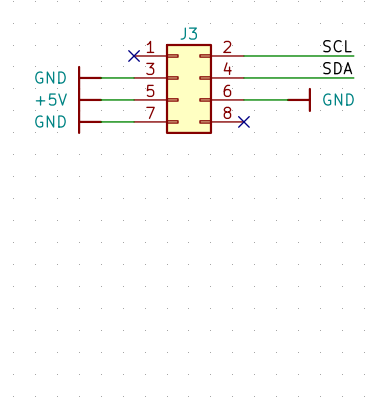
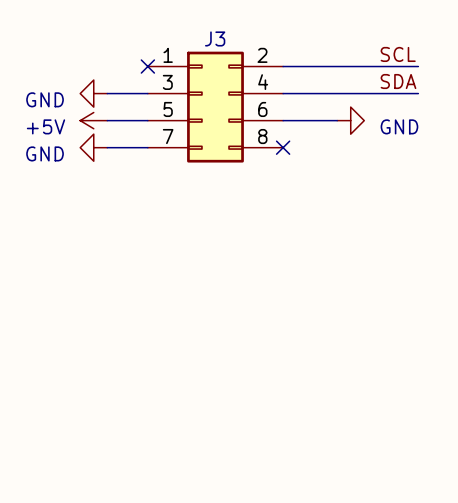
power symbol shape: [77, 65, 103, 91] -> [80, 80, 108, 108]
power symbol shape: [77, 87, 103, 113] -> [80, 112, 108, 129]
power symbol shape: [286, 87, 311, 113] -> [337, 107, 365, 135]
power symbol shape: [77, 109, 103, 135] -> [80, 134, 108, 162]

